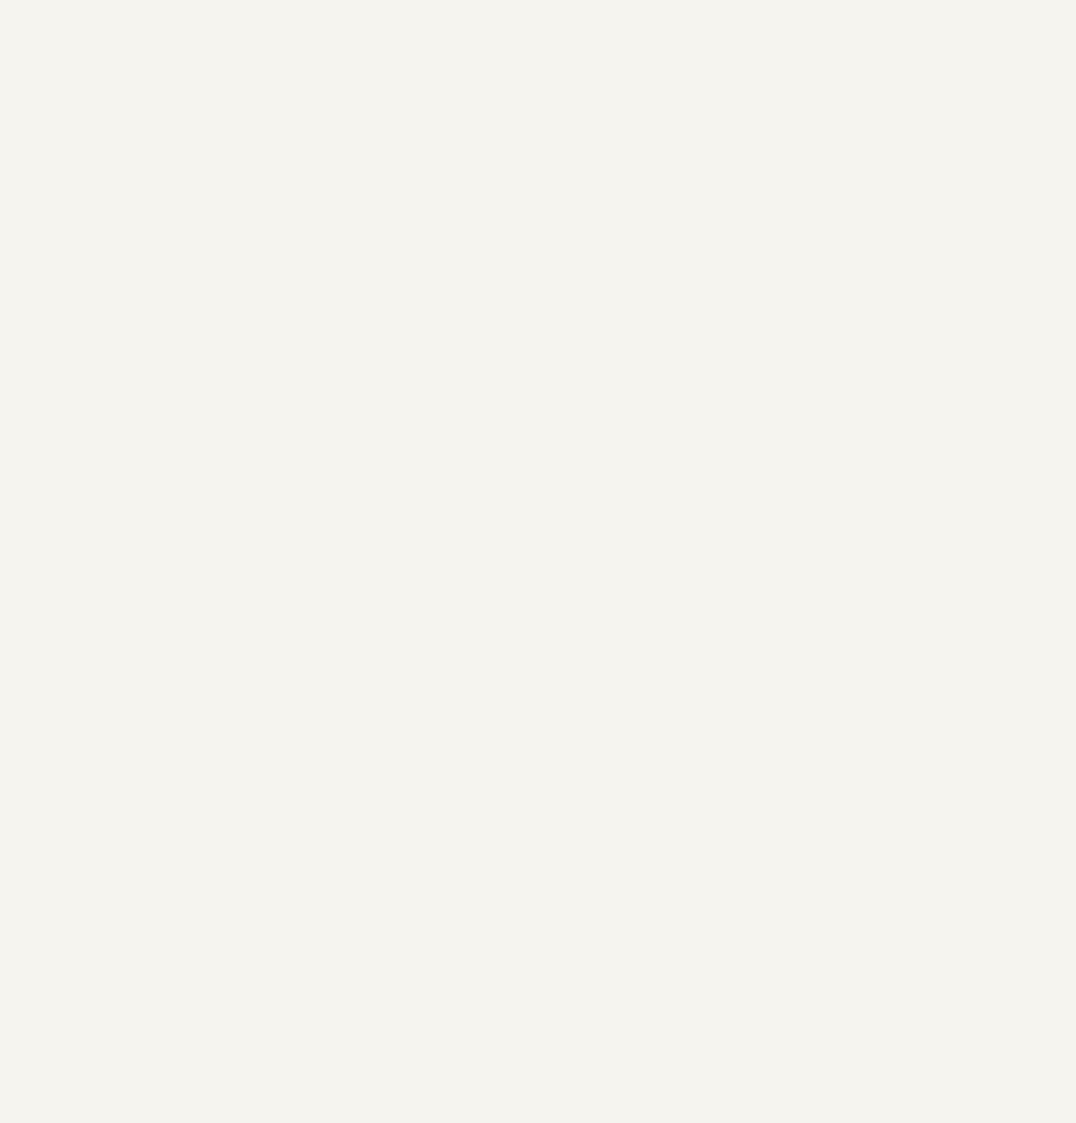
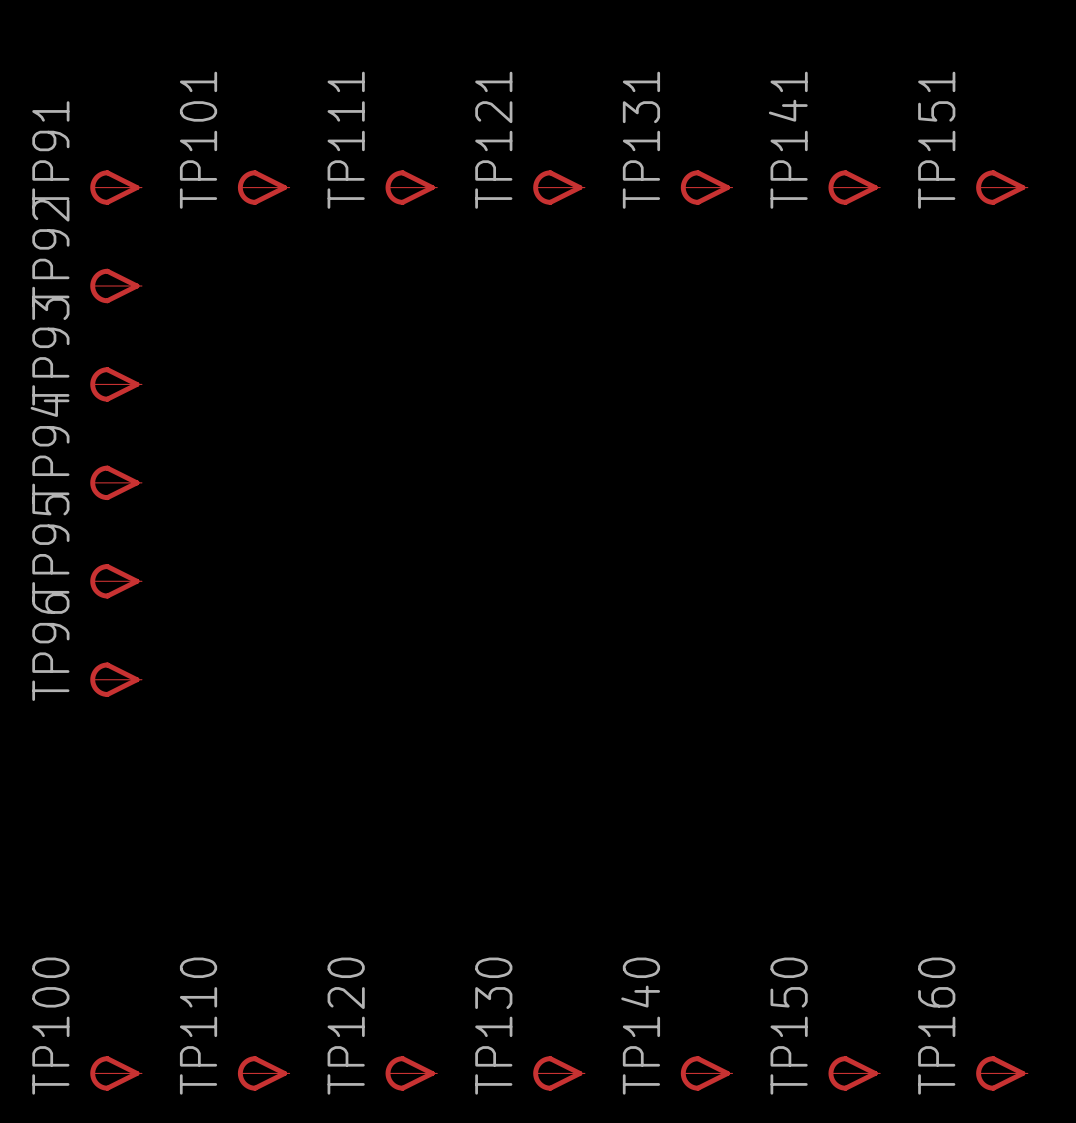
TP91: none -> (116, 187)
TP101: none -> (263, 187)
TP111: none -> (411, 187)
TP121: none -> (559, 187)
TP131: none -> (706, 187)
TP141: none -> (854, 187)
TP151: none -> (1001, 187)
TP92: none -> (116, 286)
TP93: none -> (116, 384)
TP94: none -> (116, 482)
TP95: none -> (116, 581)
TP96: none -> (116, 679)
TP100: none -> (116, 1073)
TP110: none -> (263, 1073)
TP120: none -> (411, 1073)
TP130: none -> (559, 1073)
TP140: none -> (706, 1073)
TP150: none -> (854, 1073)
TP160: none -> (1001, 1073)

